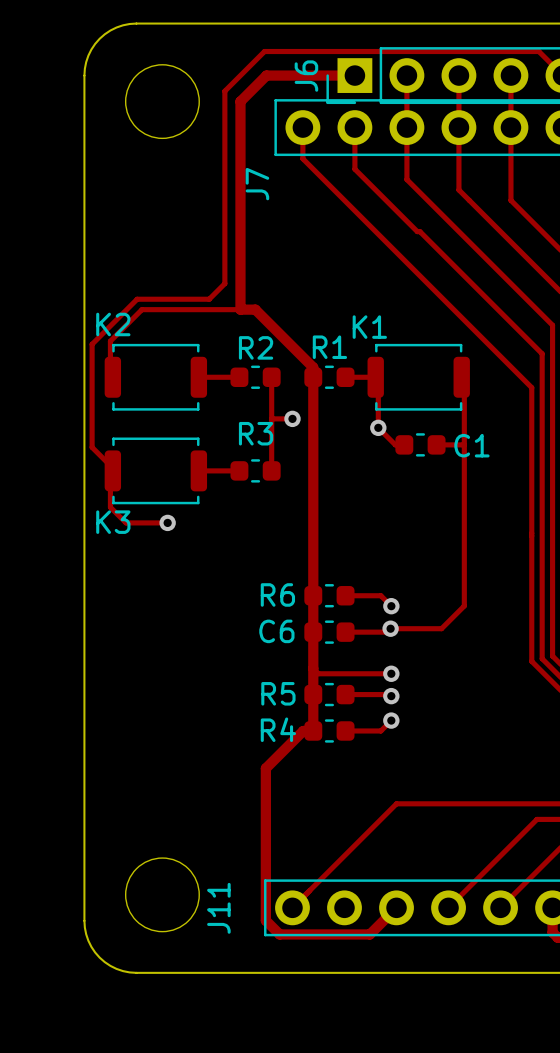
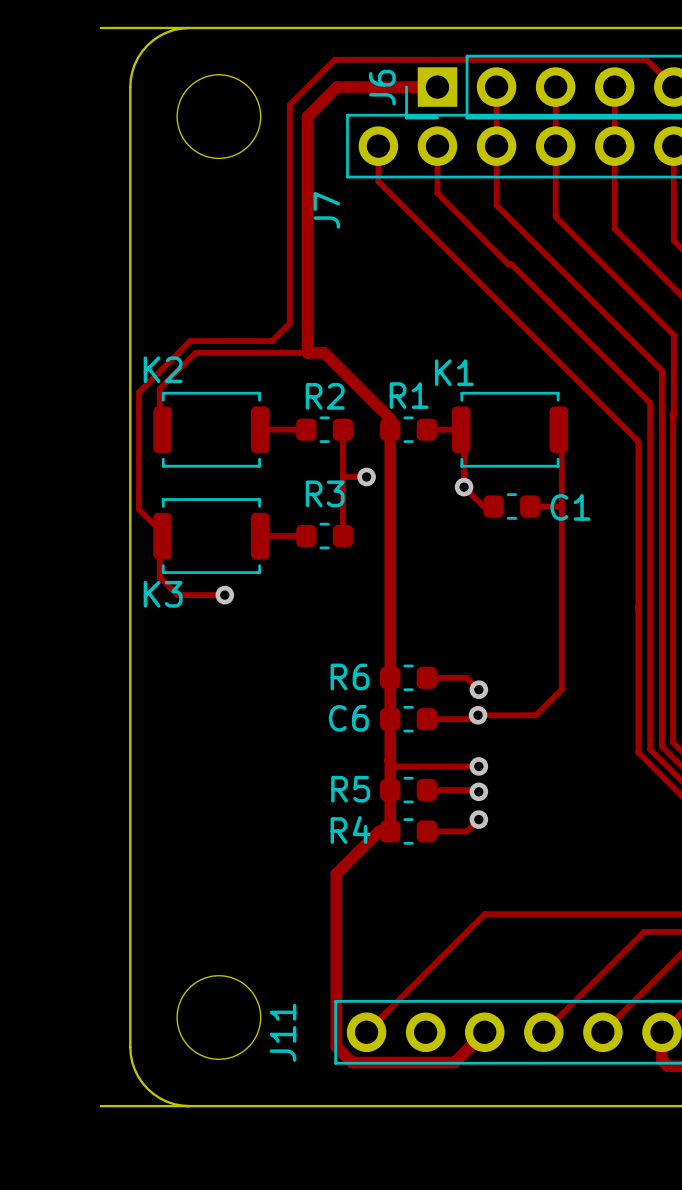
board edge: none -> (100, 27) (189, 27)
board edge: none -> (100, 1106) (189, 1106)

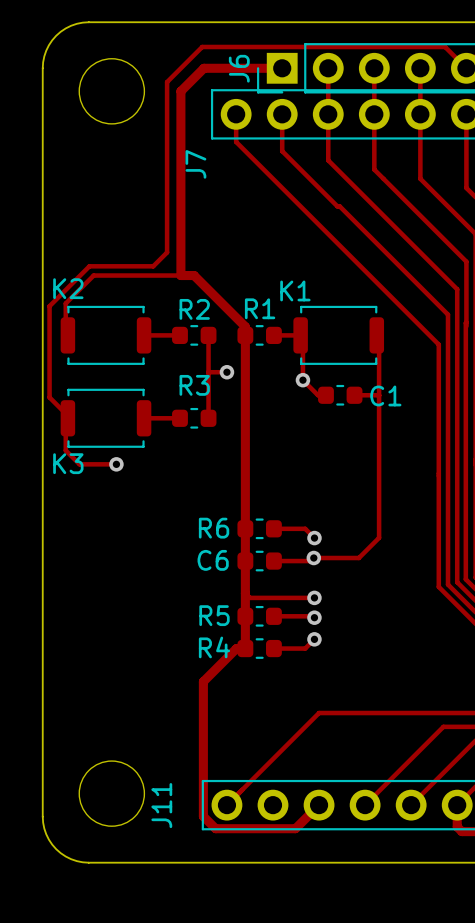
board edge: (100, 27) (189, 27) -> none
board edge: (100, 1106) (189, 1106) -> none

